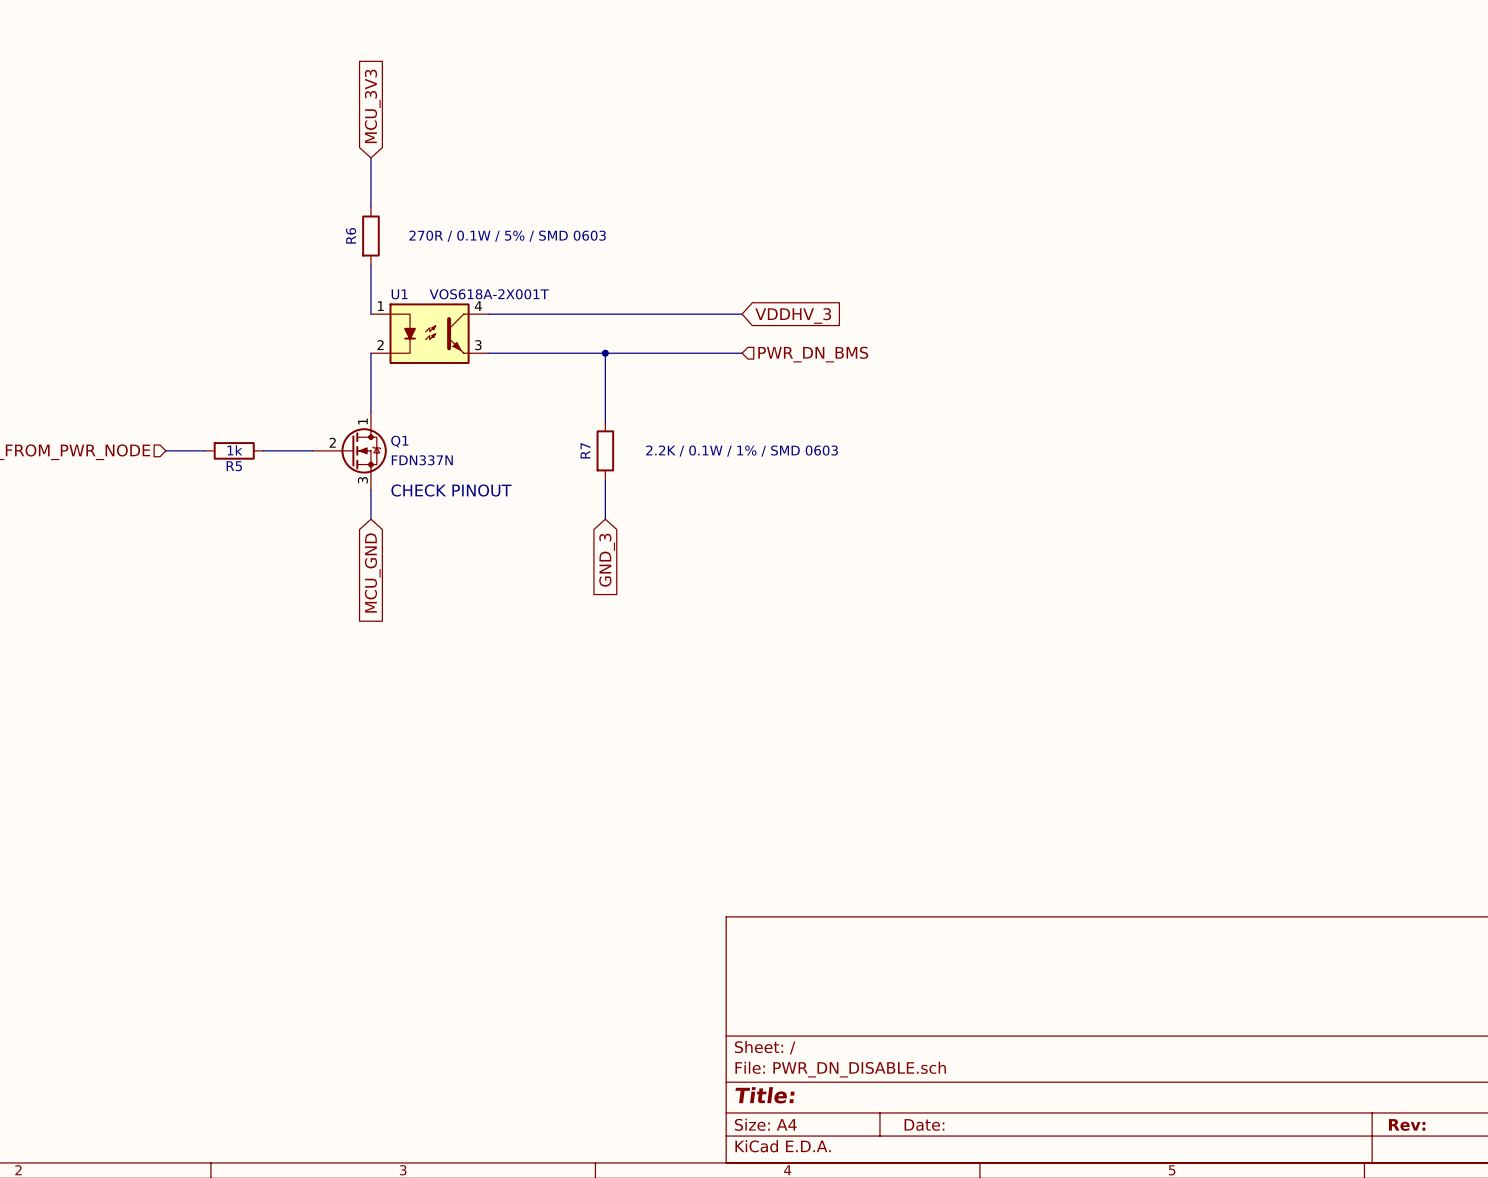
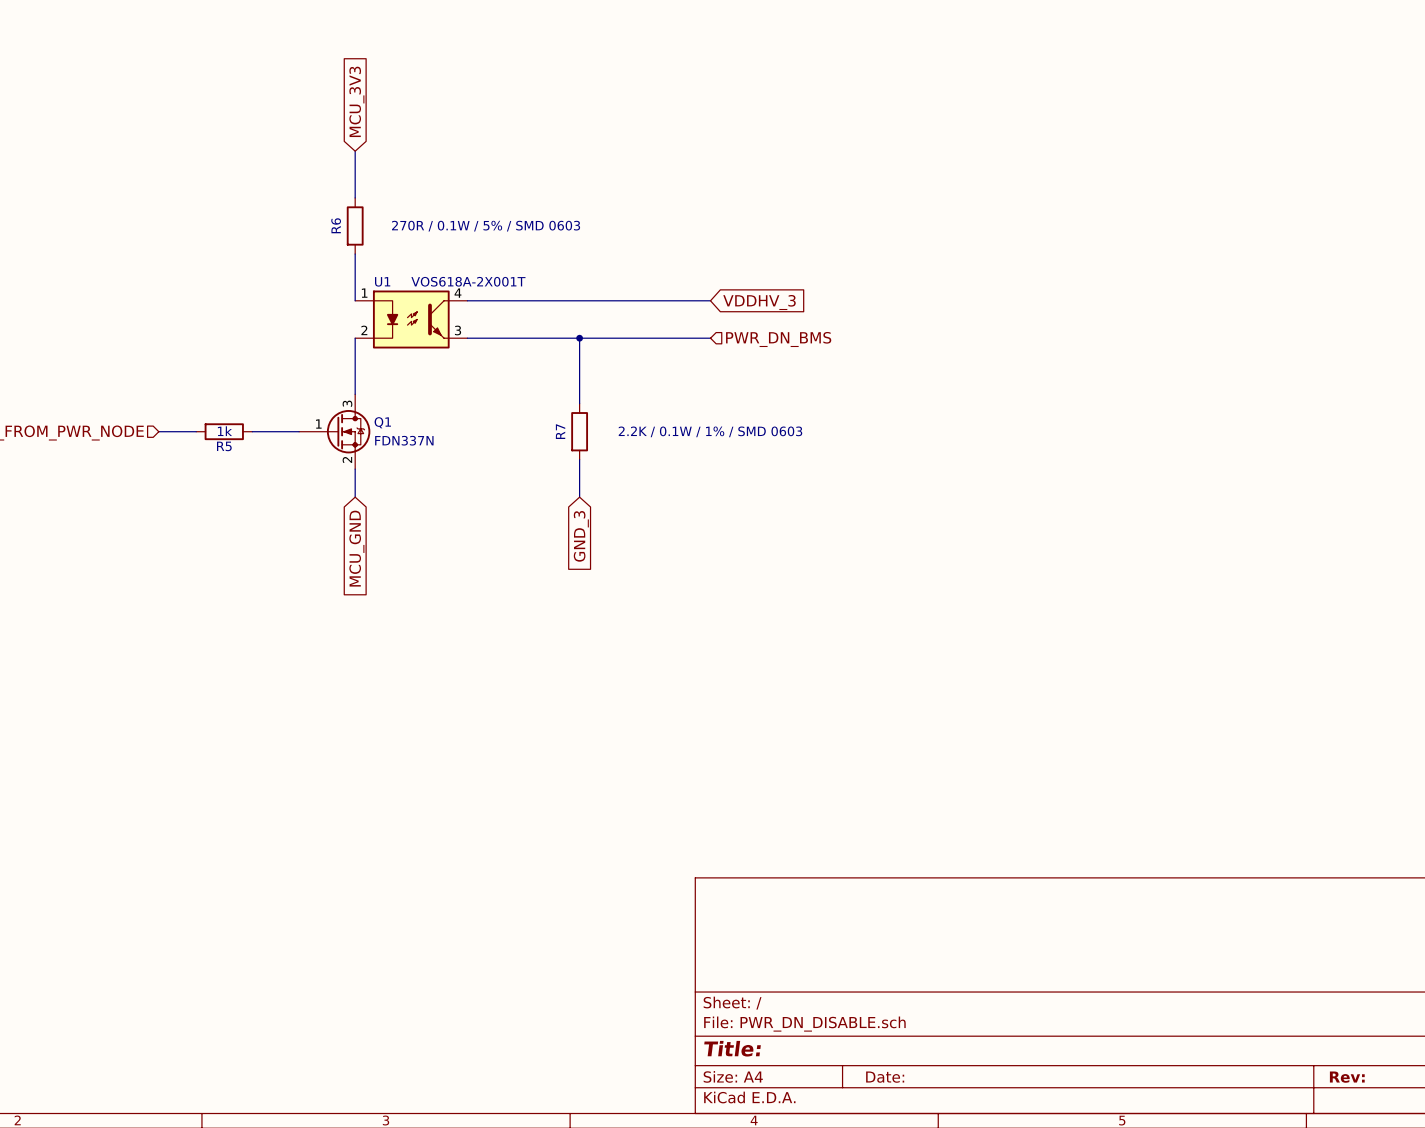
Q1 pin number: 1 (362, 421) -> 3 (347, 403)
Q1 pin number: 2 (332, 442) -> 1 (318, 424)
Q1 pin number: 3 (362, 480) -> 2 (347, 459)
text: CHECK PINOUT (451, 490) -> none

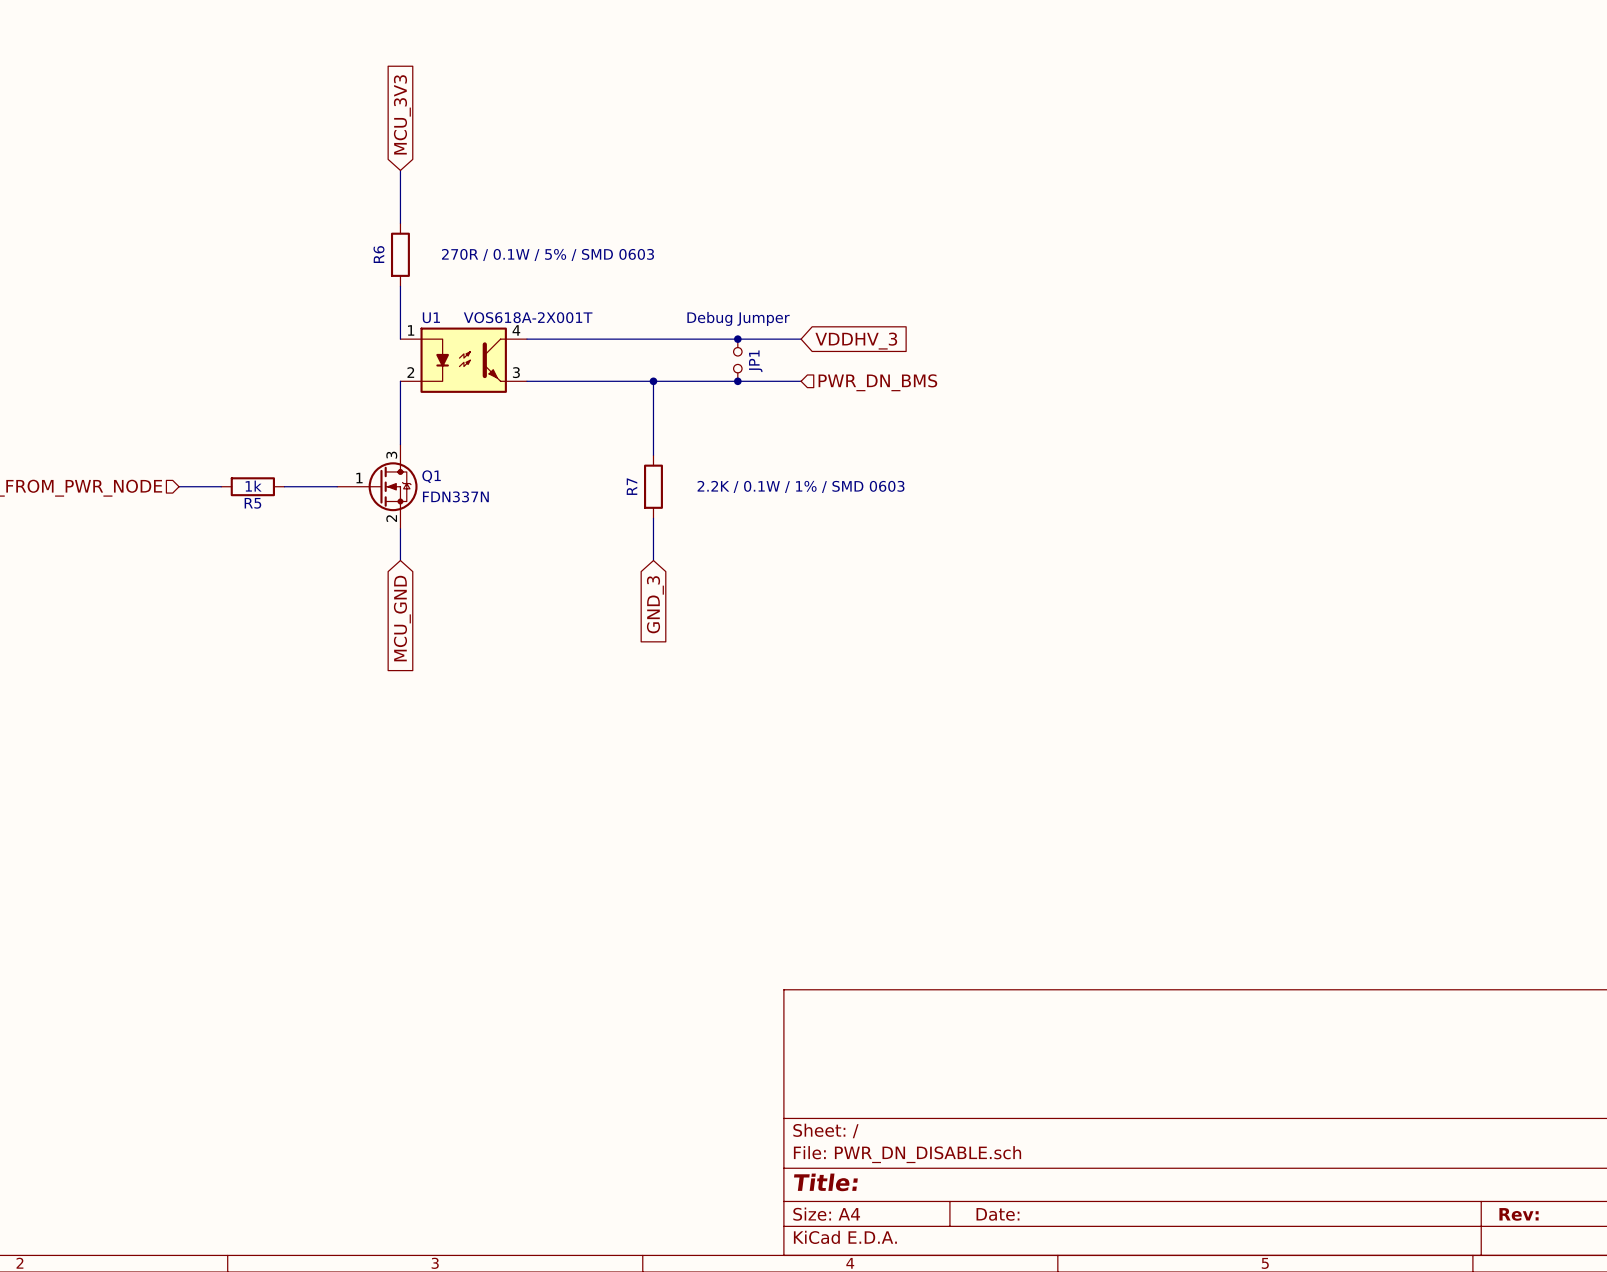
junction: none -> (737, 339)
JP1: none -> Debug Jumper (737, 360)
junction: none -> (737, 381)

